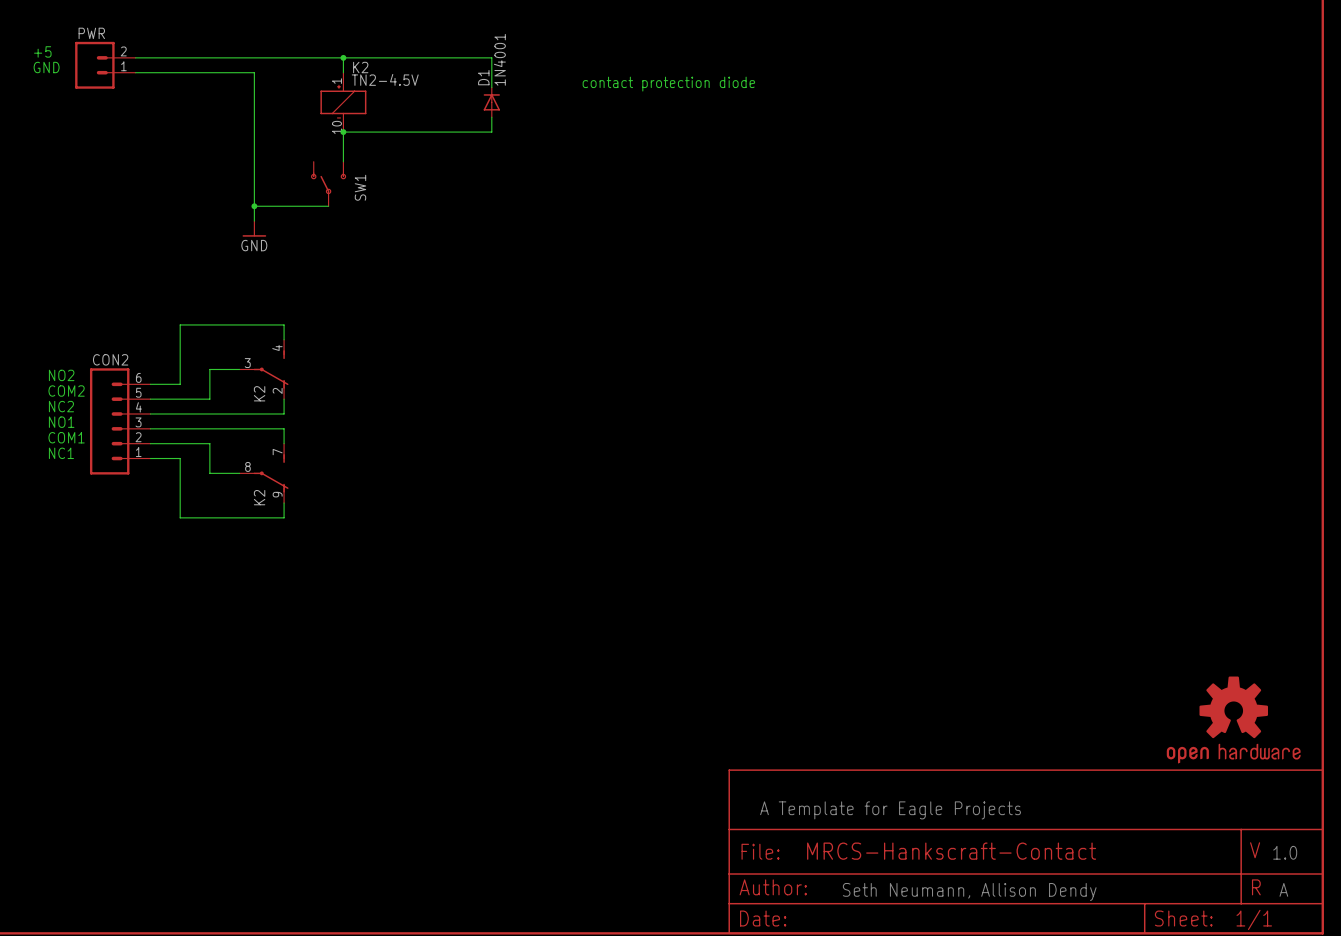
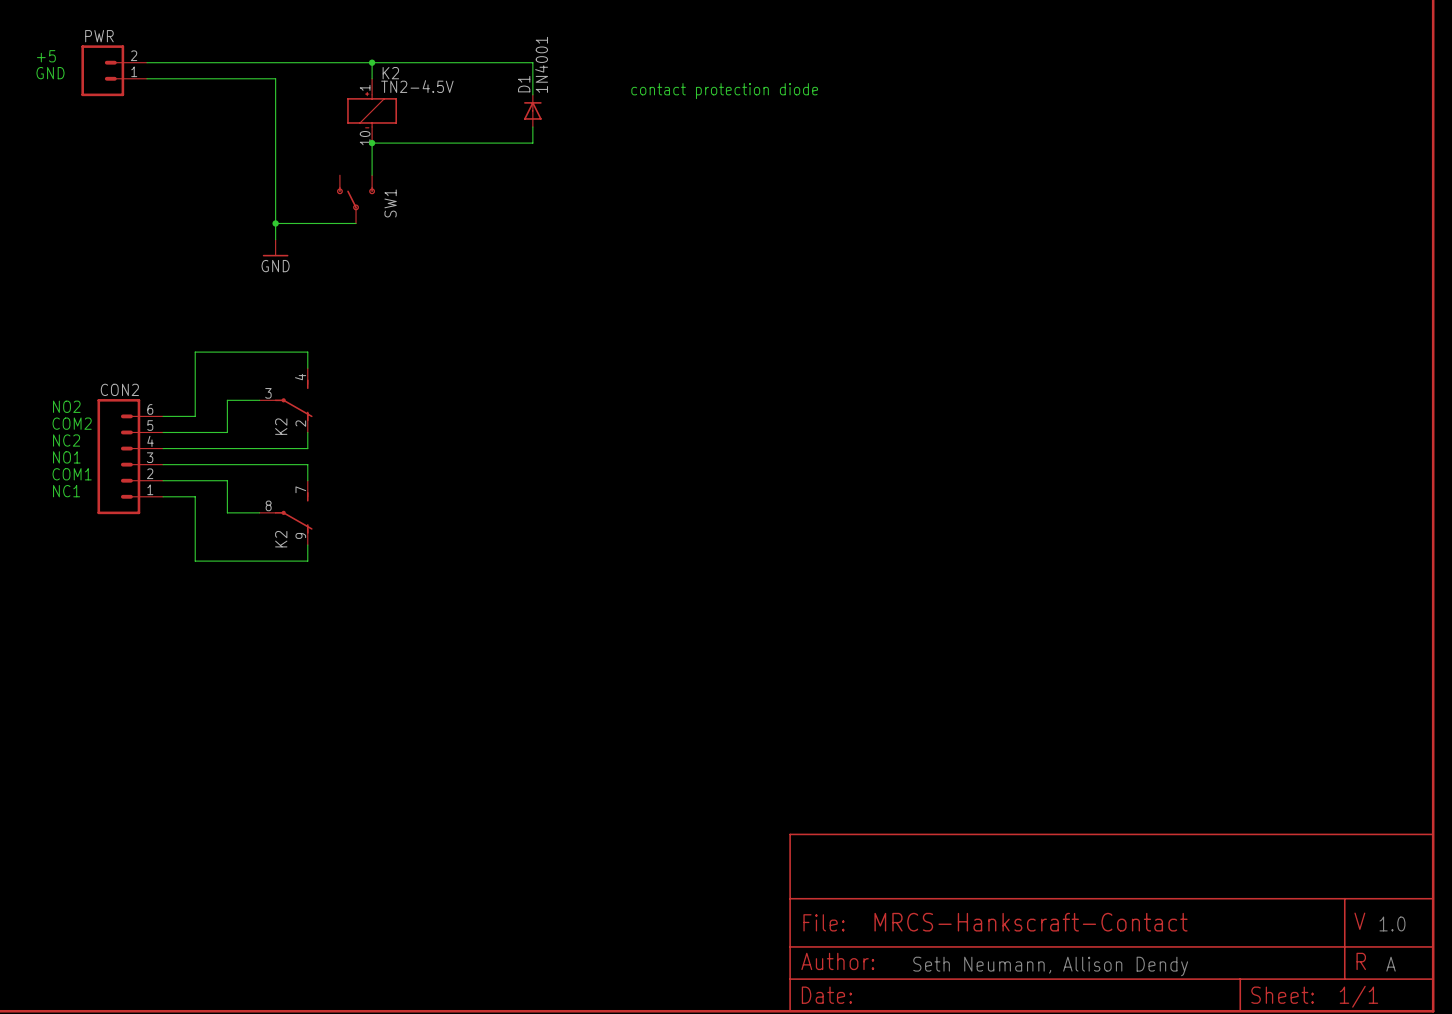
part: (1233, 719) -> none
text: A Template for Eagle Projects (890, 810) -> none

